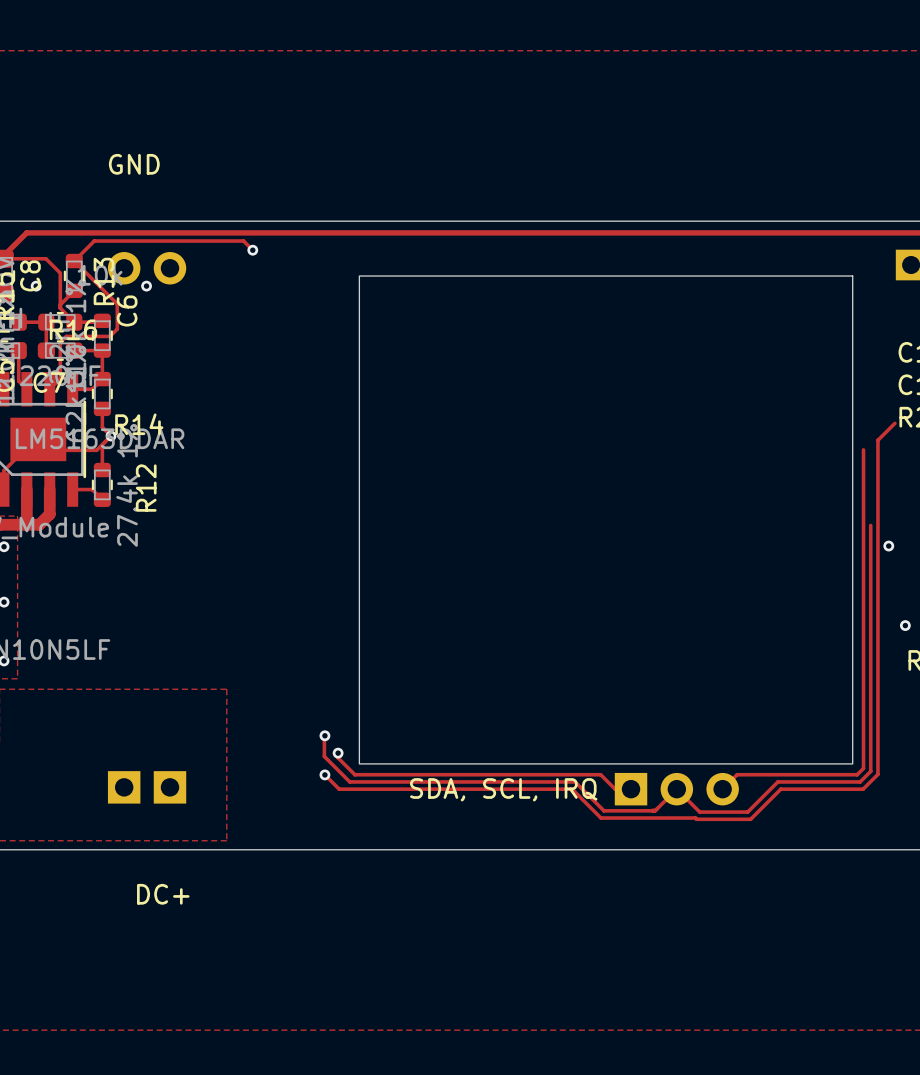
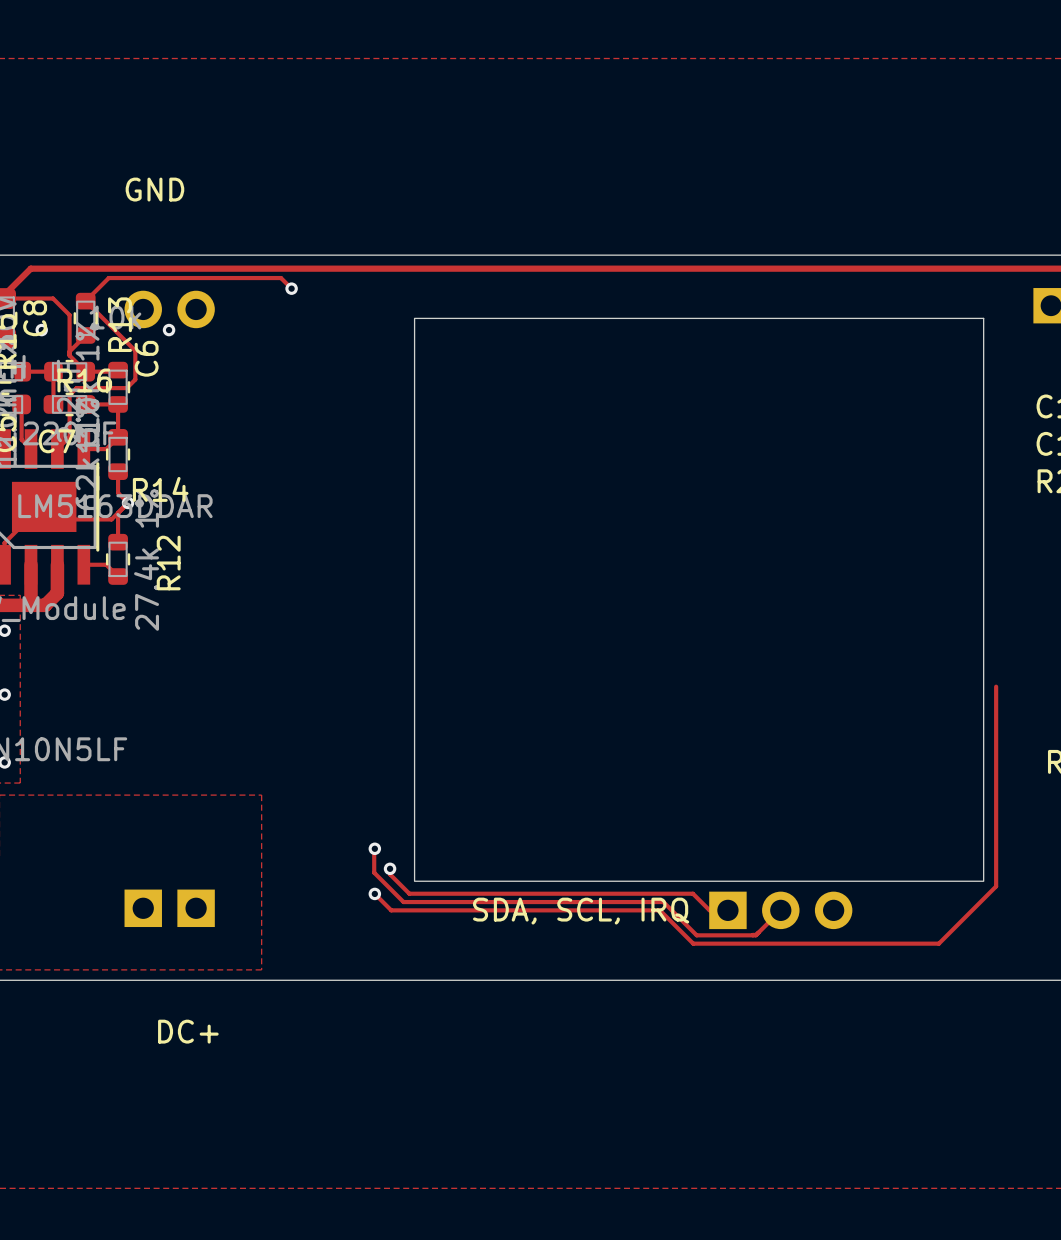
track: (894, 423) (877, 440) (877, 774) (863, 789) (780, 789) (750, 819) (695, 818) -> none
track: (863, 449) (863, 595) -> none
track: (870, 525) (870, 771) (860, 781) (777, 781) (747, 812) (699, 812) (676, 789) -> none
via: (888, 546) -> none
via: (905, 625) -> none
track: (857, 774) (737, 774) (722, 789) -> (988, 893) (938, 943) (802, 943)

